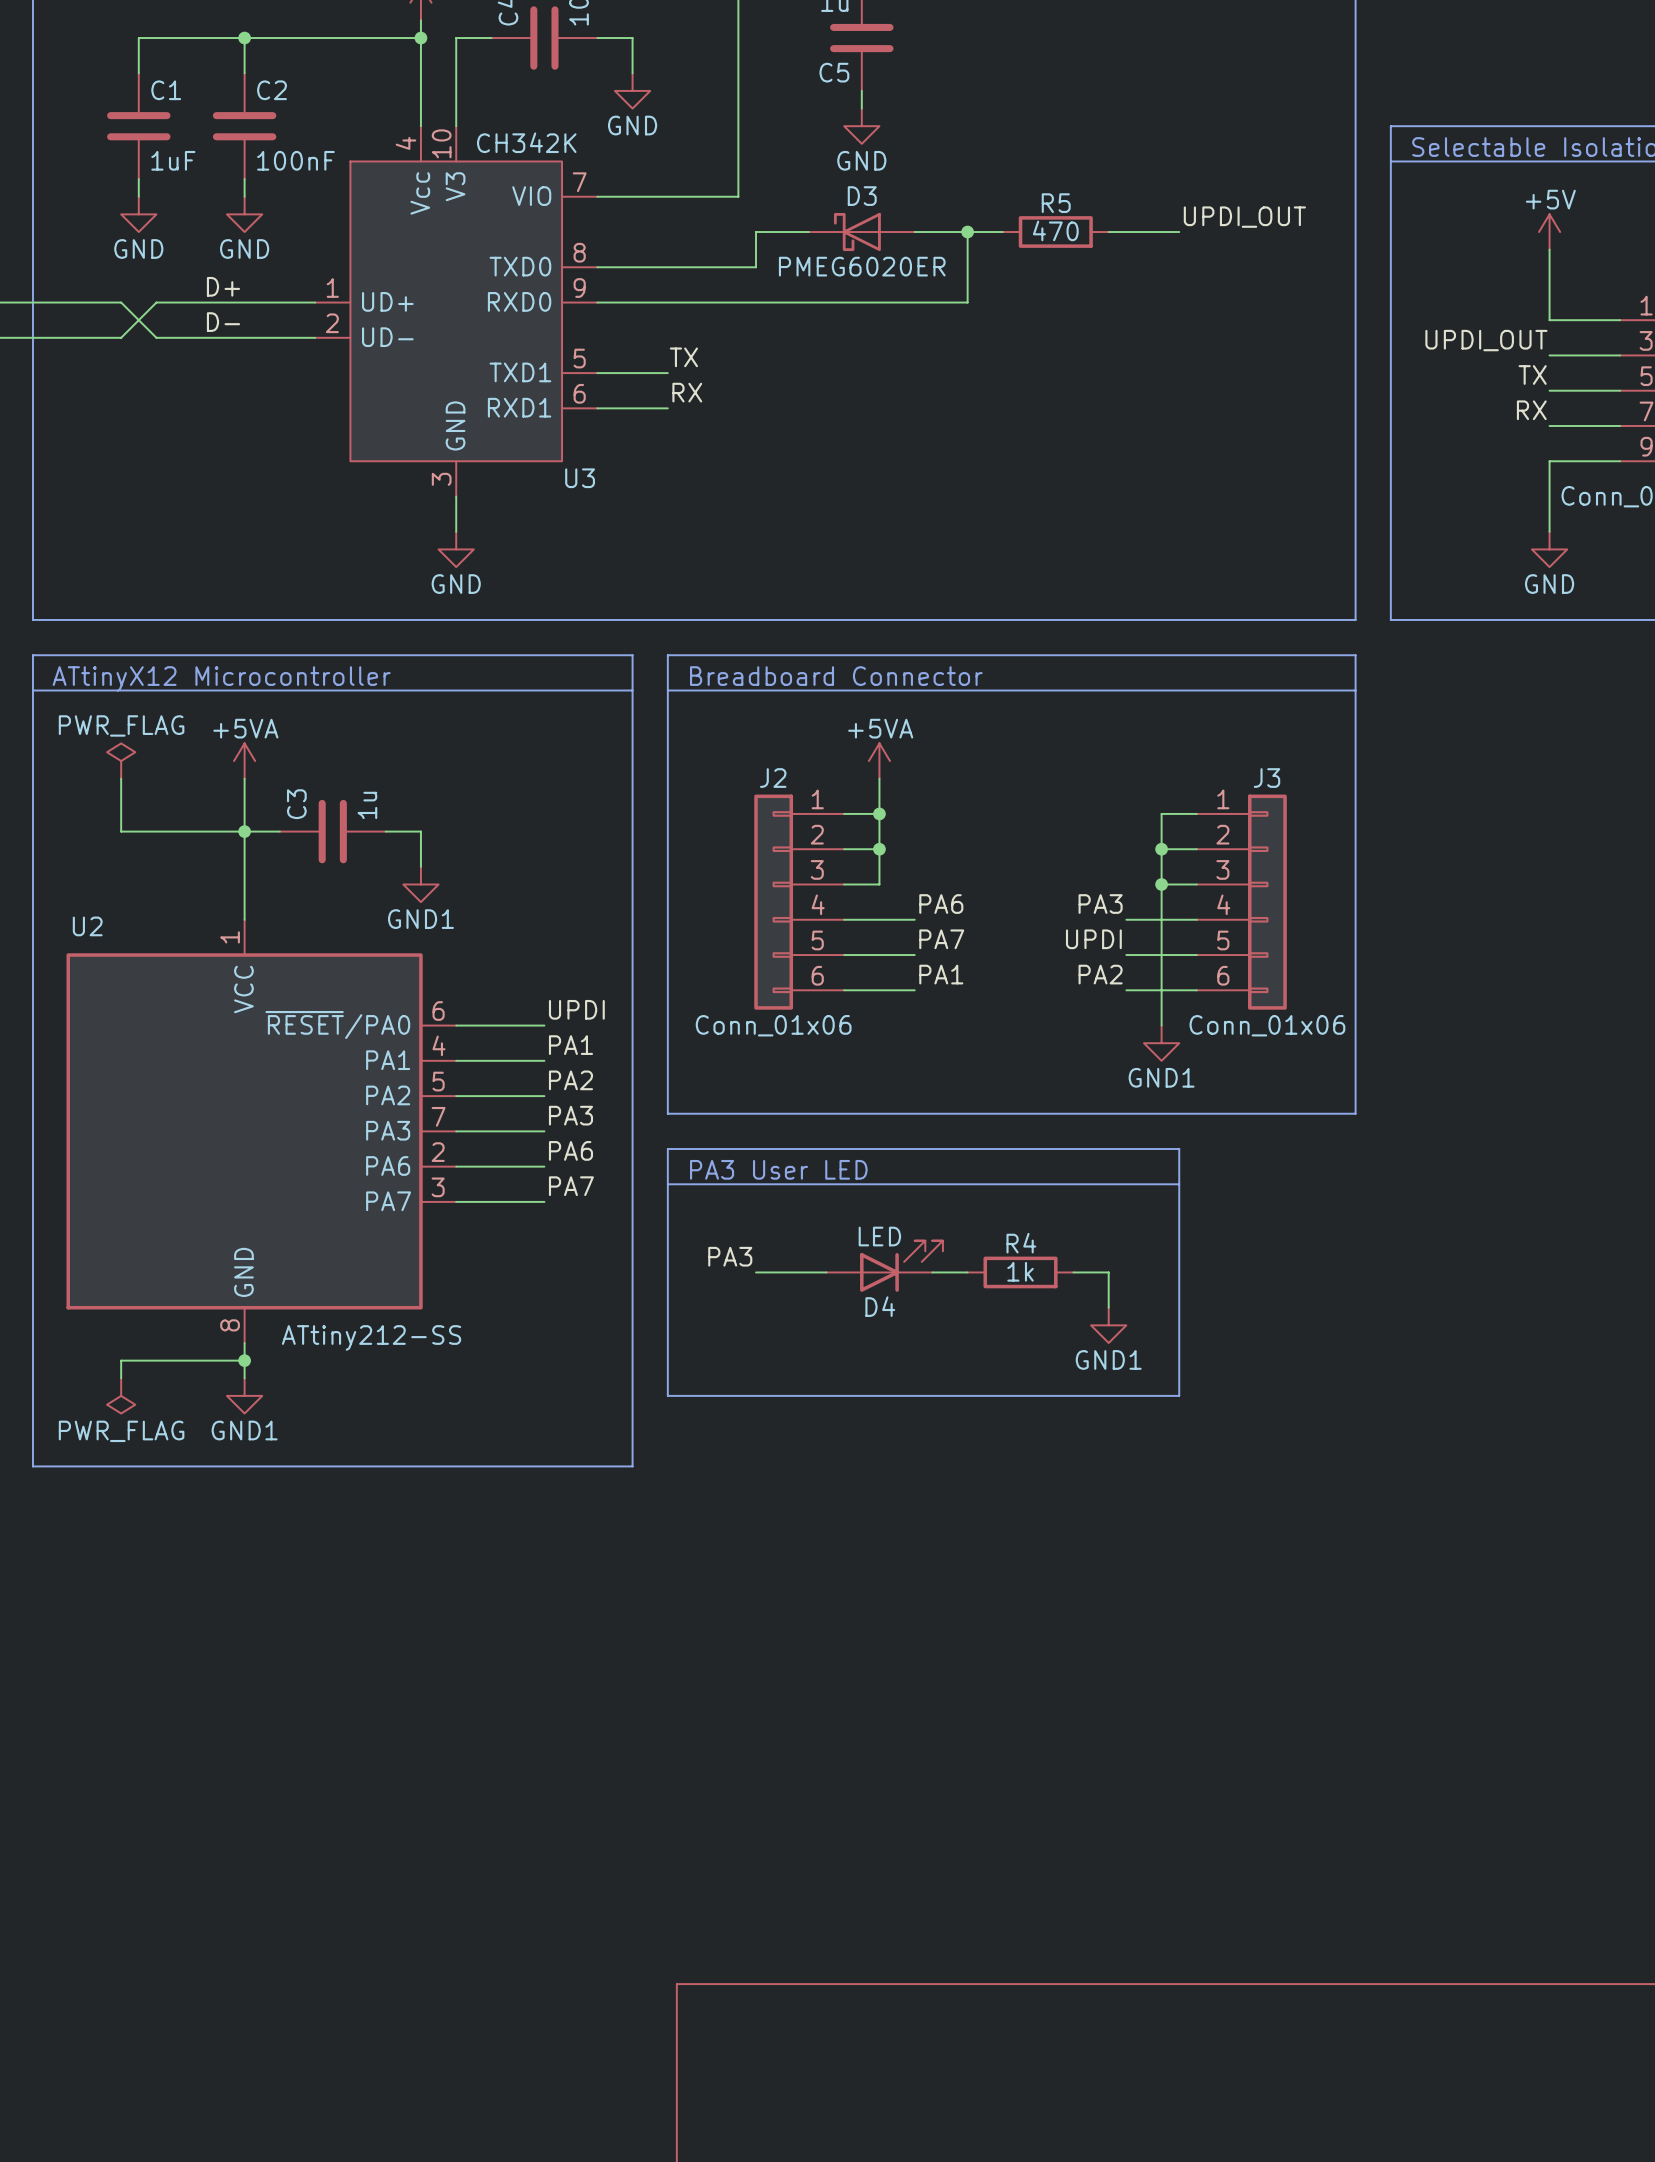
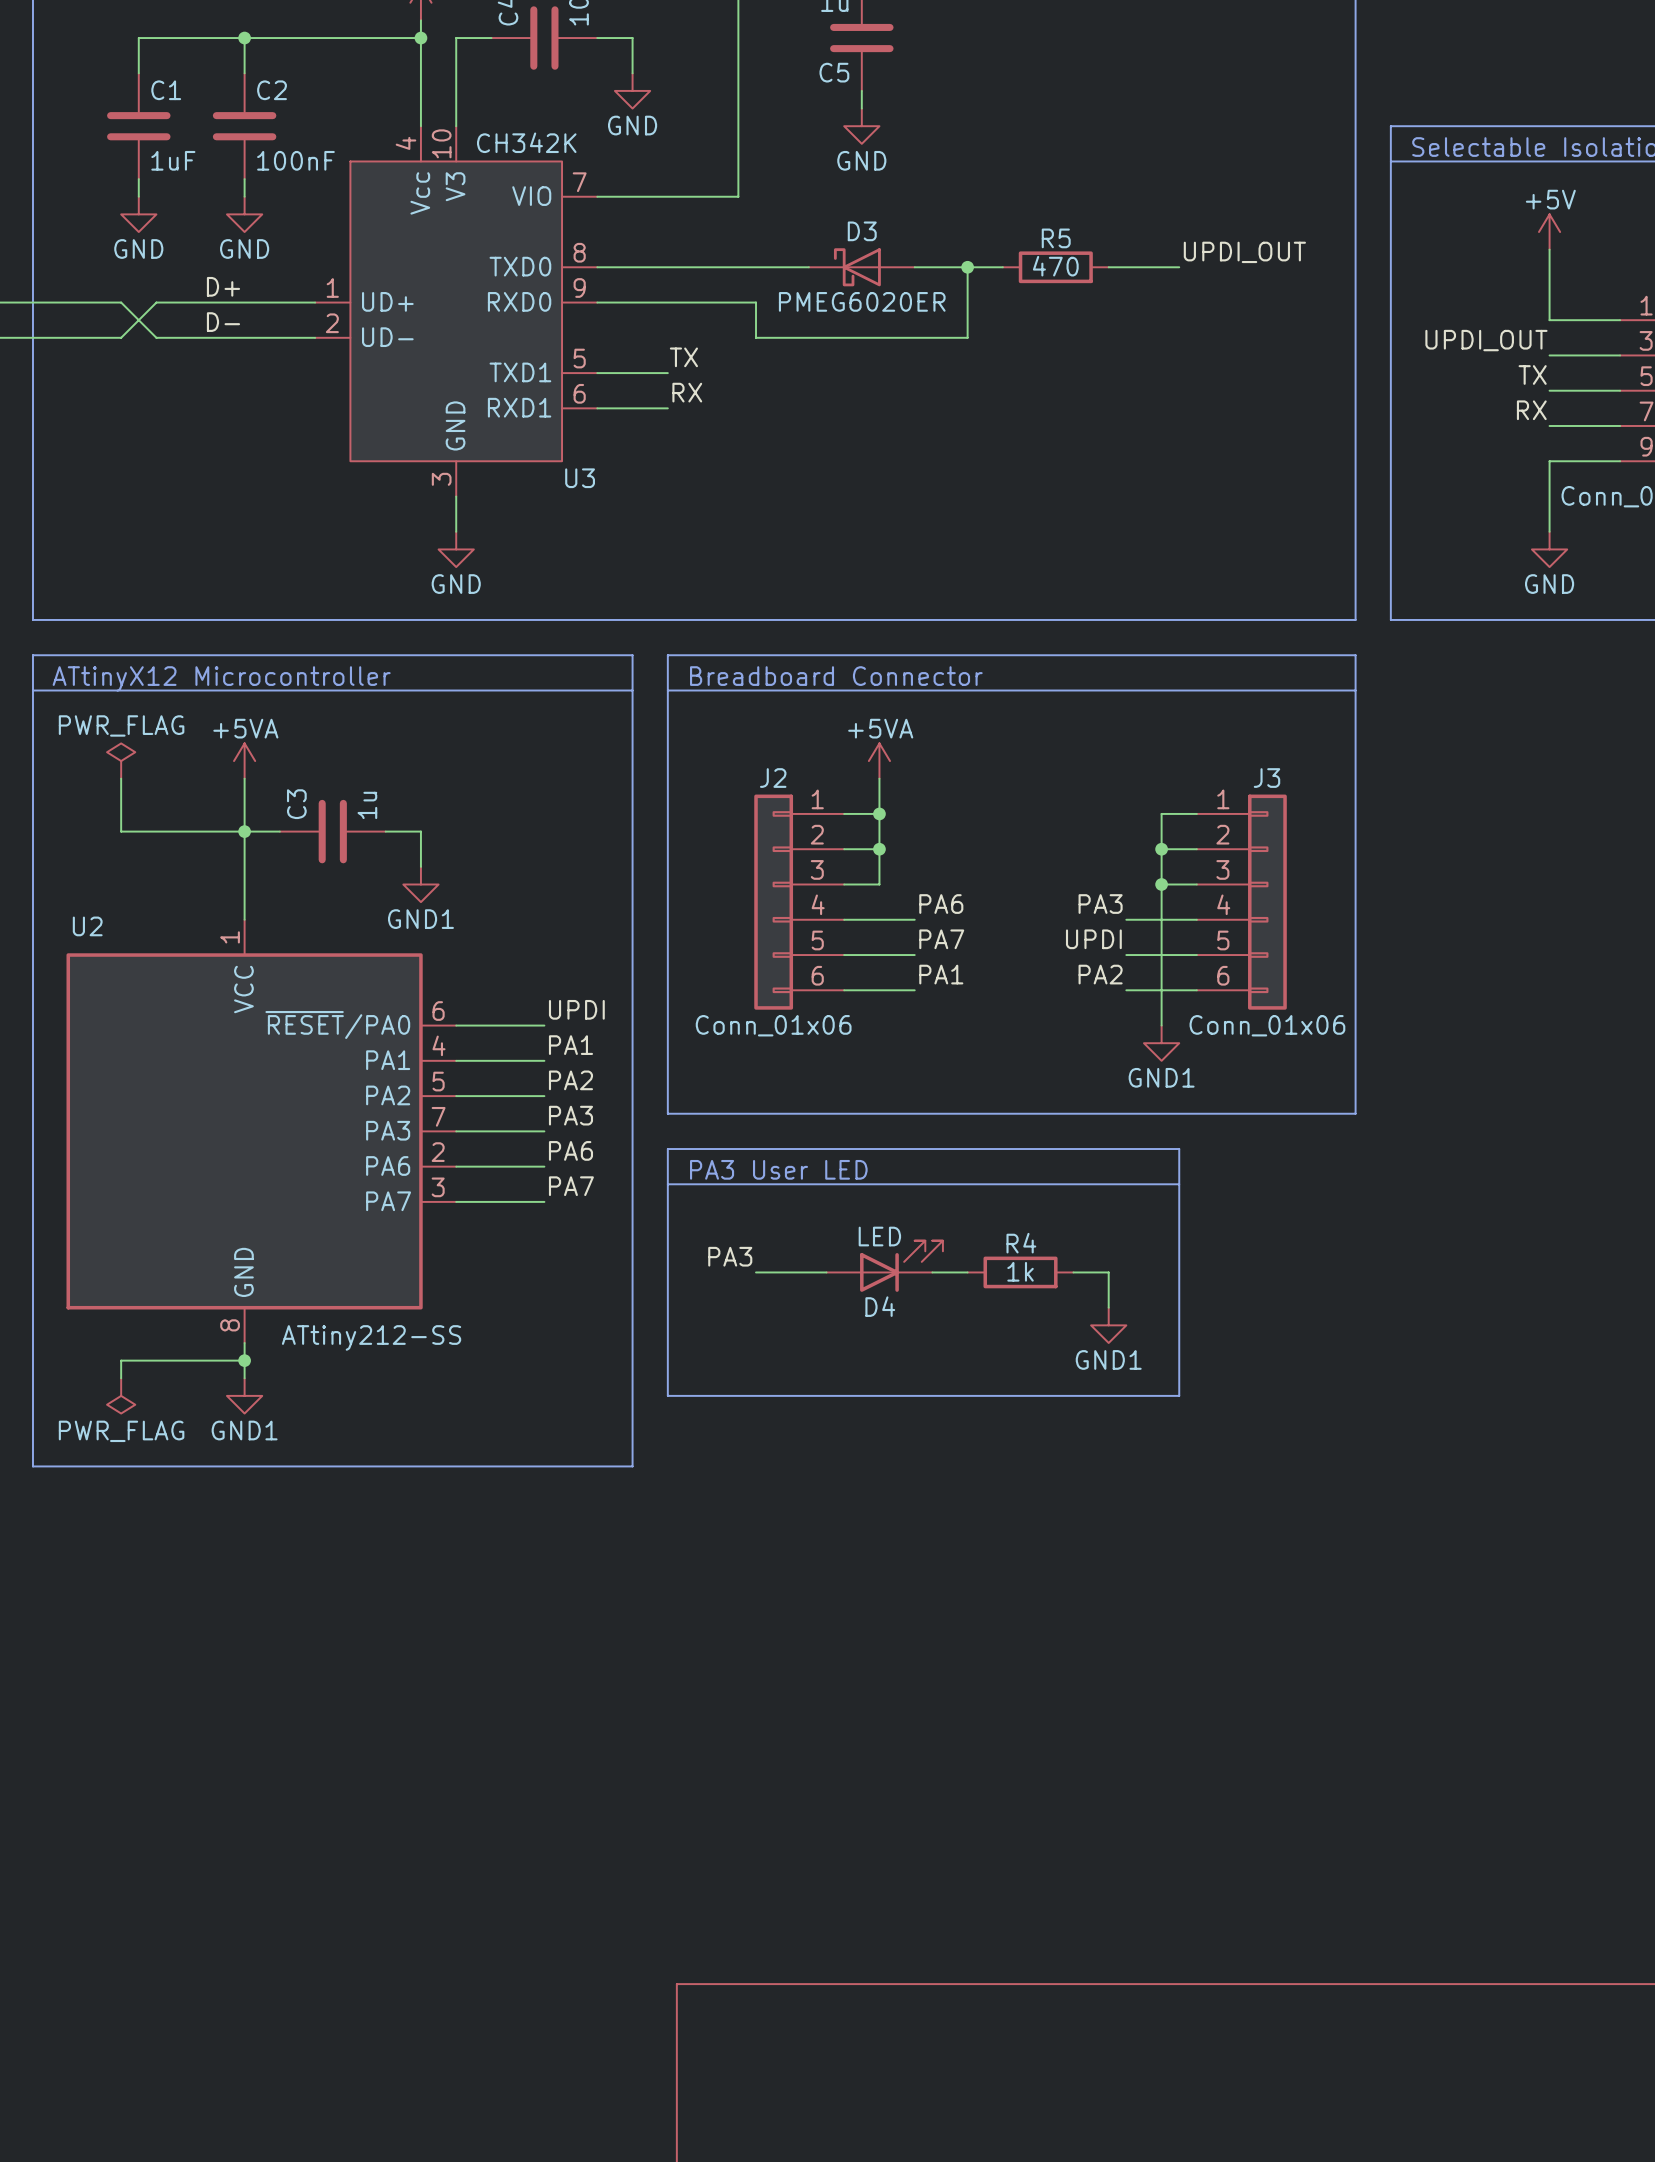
label position: UPDI_OUT (1244, 217) -> UPDI_OUT (1244, 252)
wire: (808, 232) (756, 232) (756, 267) -> (808, 267) (756, 267)
D3 position: (861, 232) -> (861, 267)
wire: (914, 232) (1002, 232) -> (914, 267) (1002, 267)
wire: (967, 232) (967, 267) -> none
junction position: (967, 232) -> (967, 267)
R5 position: (1055, 232) -> (1055, 267)
wire: (1108, 232) (1179, 232) -> (1108, 267) (1179, 267)
wire: (756, 302) (967, 302) -> (756, 302) (756, 337) (967, 337) (967, 302)

